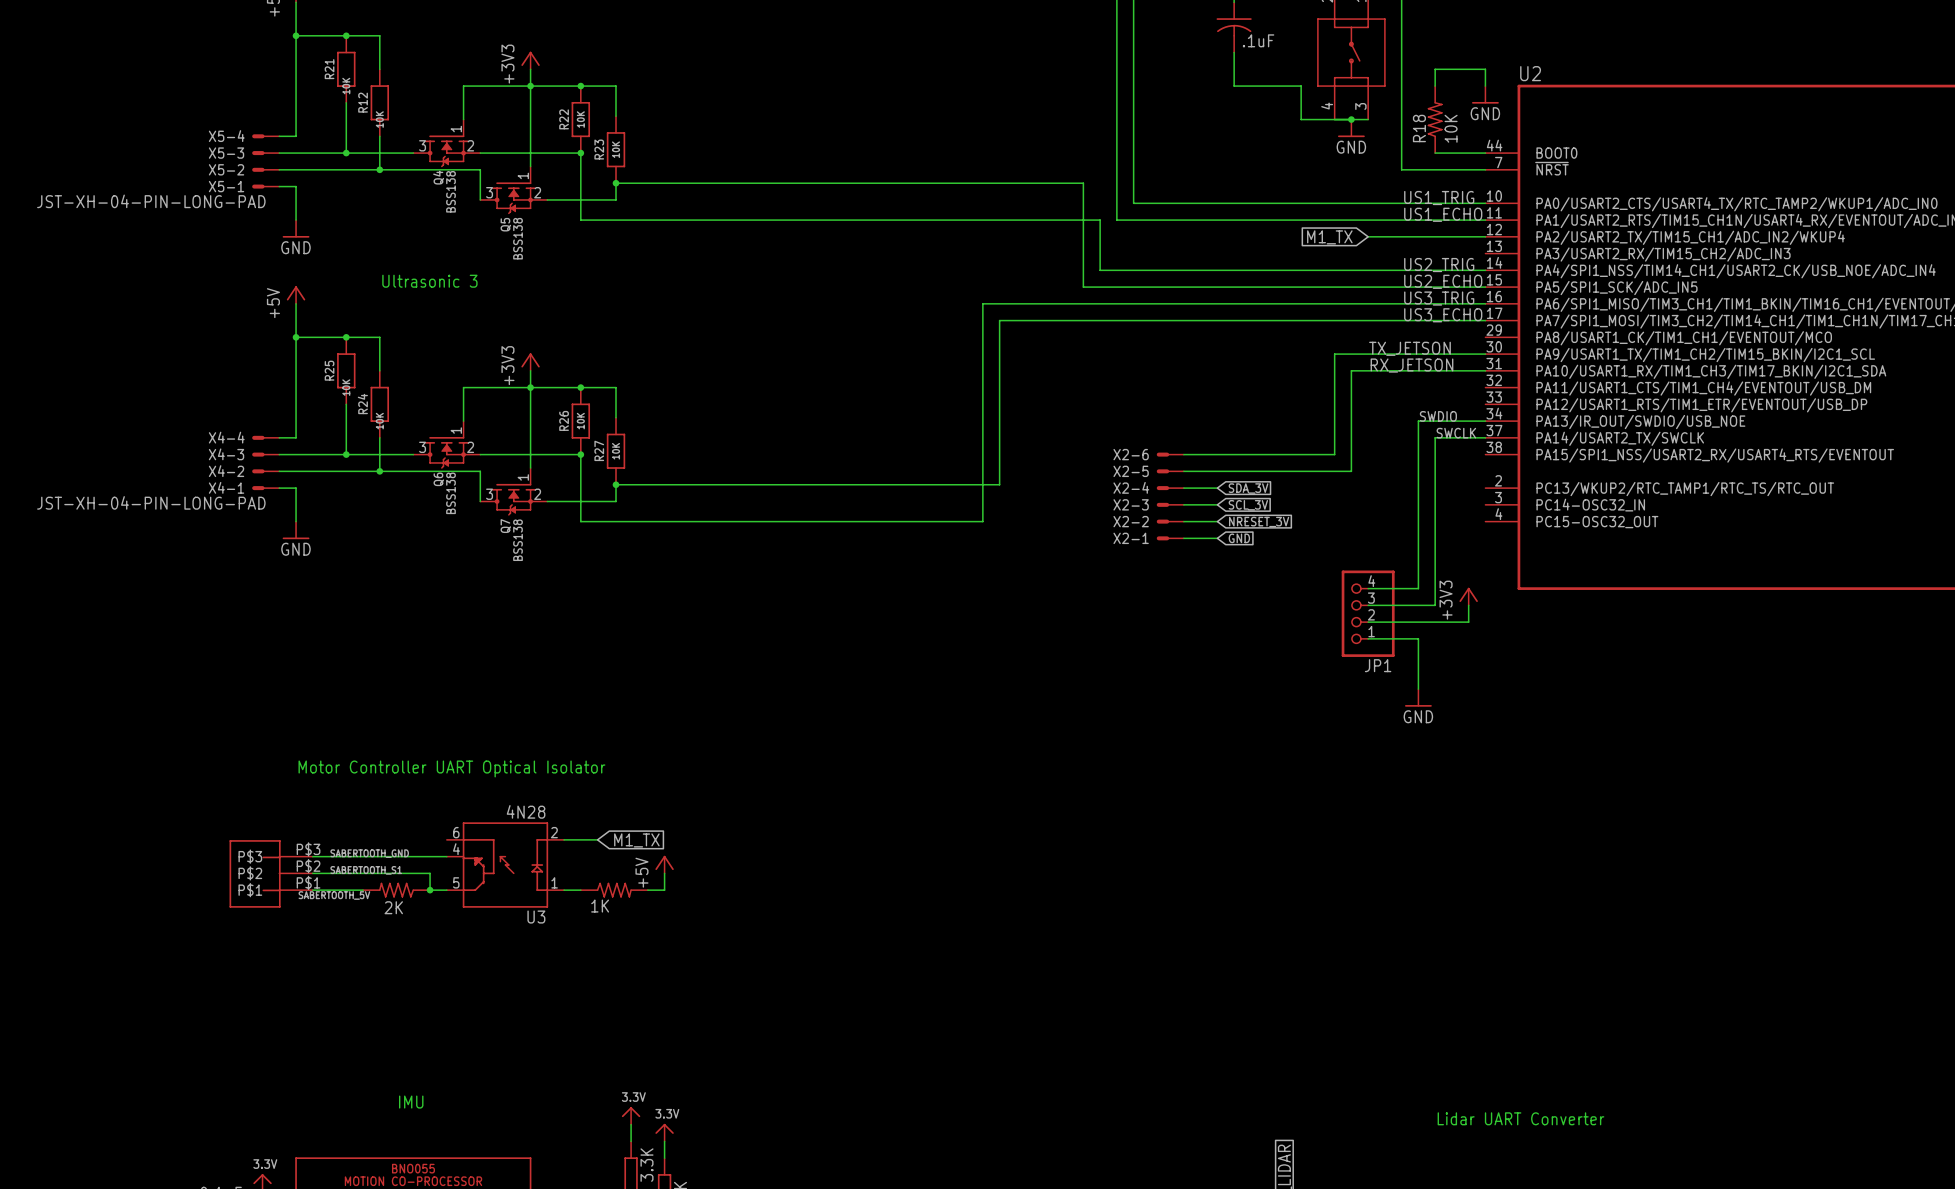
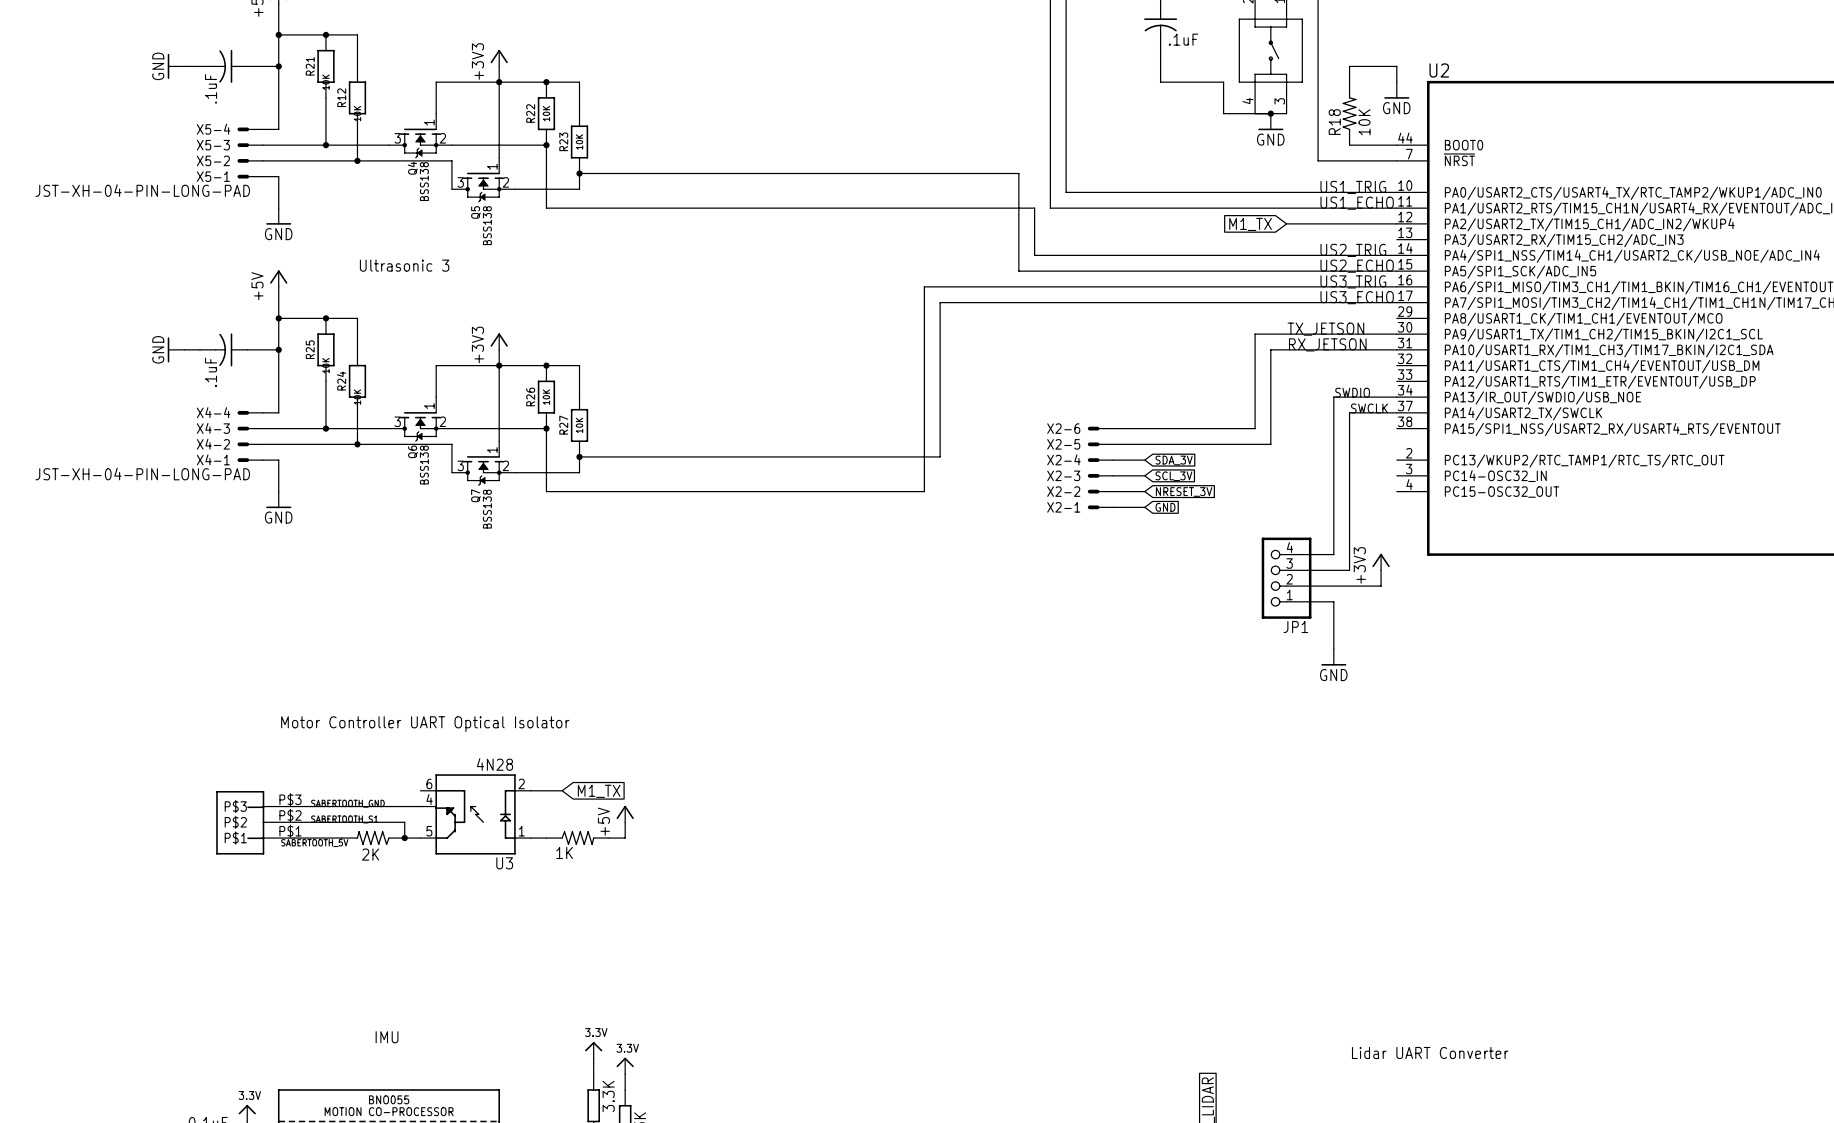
power symbol: none -> GND (175, 66)
wire: none -> (184, 66) (200, 66)
part: none -> .1uF (223, 66)
wire: none -> (247, 66) (278, 66)
junction: none -> (278, 66)
power symbol: none -> GND (175, 349)
wire: none -> (184, 349) (200, 349)
part: none -> .1uF (223, 349)
wire: none -> (247, 349) (278, 349)
junction: none -> (278, 349)

